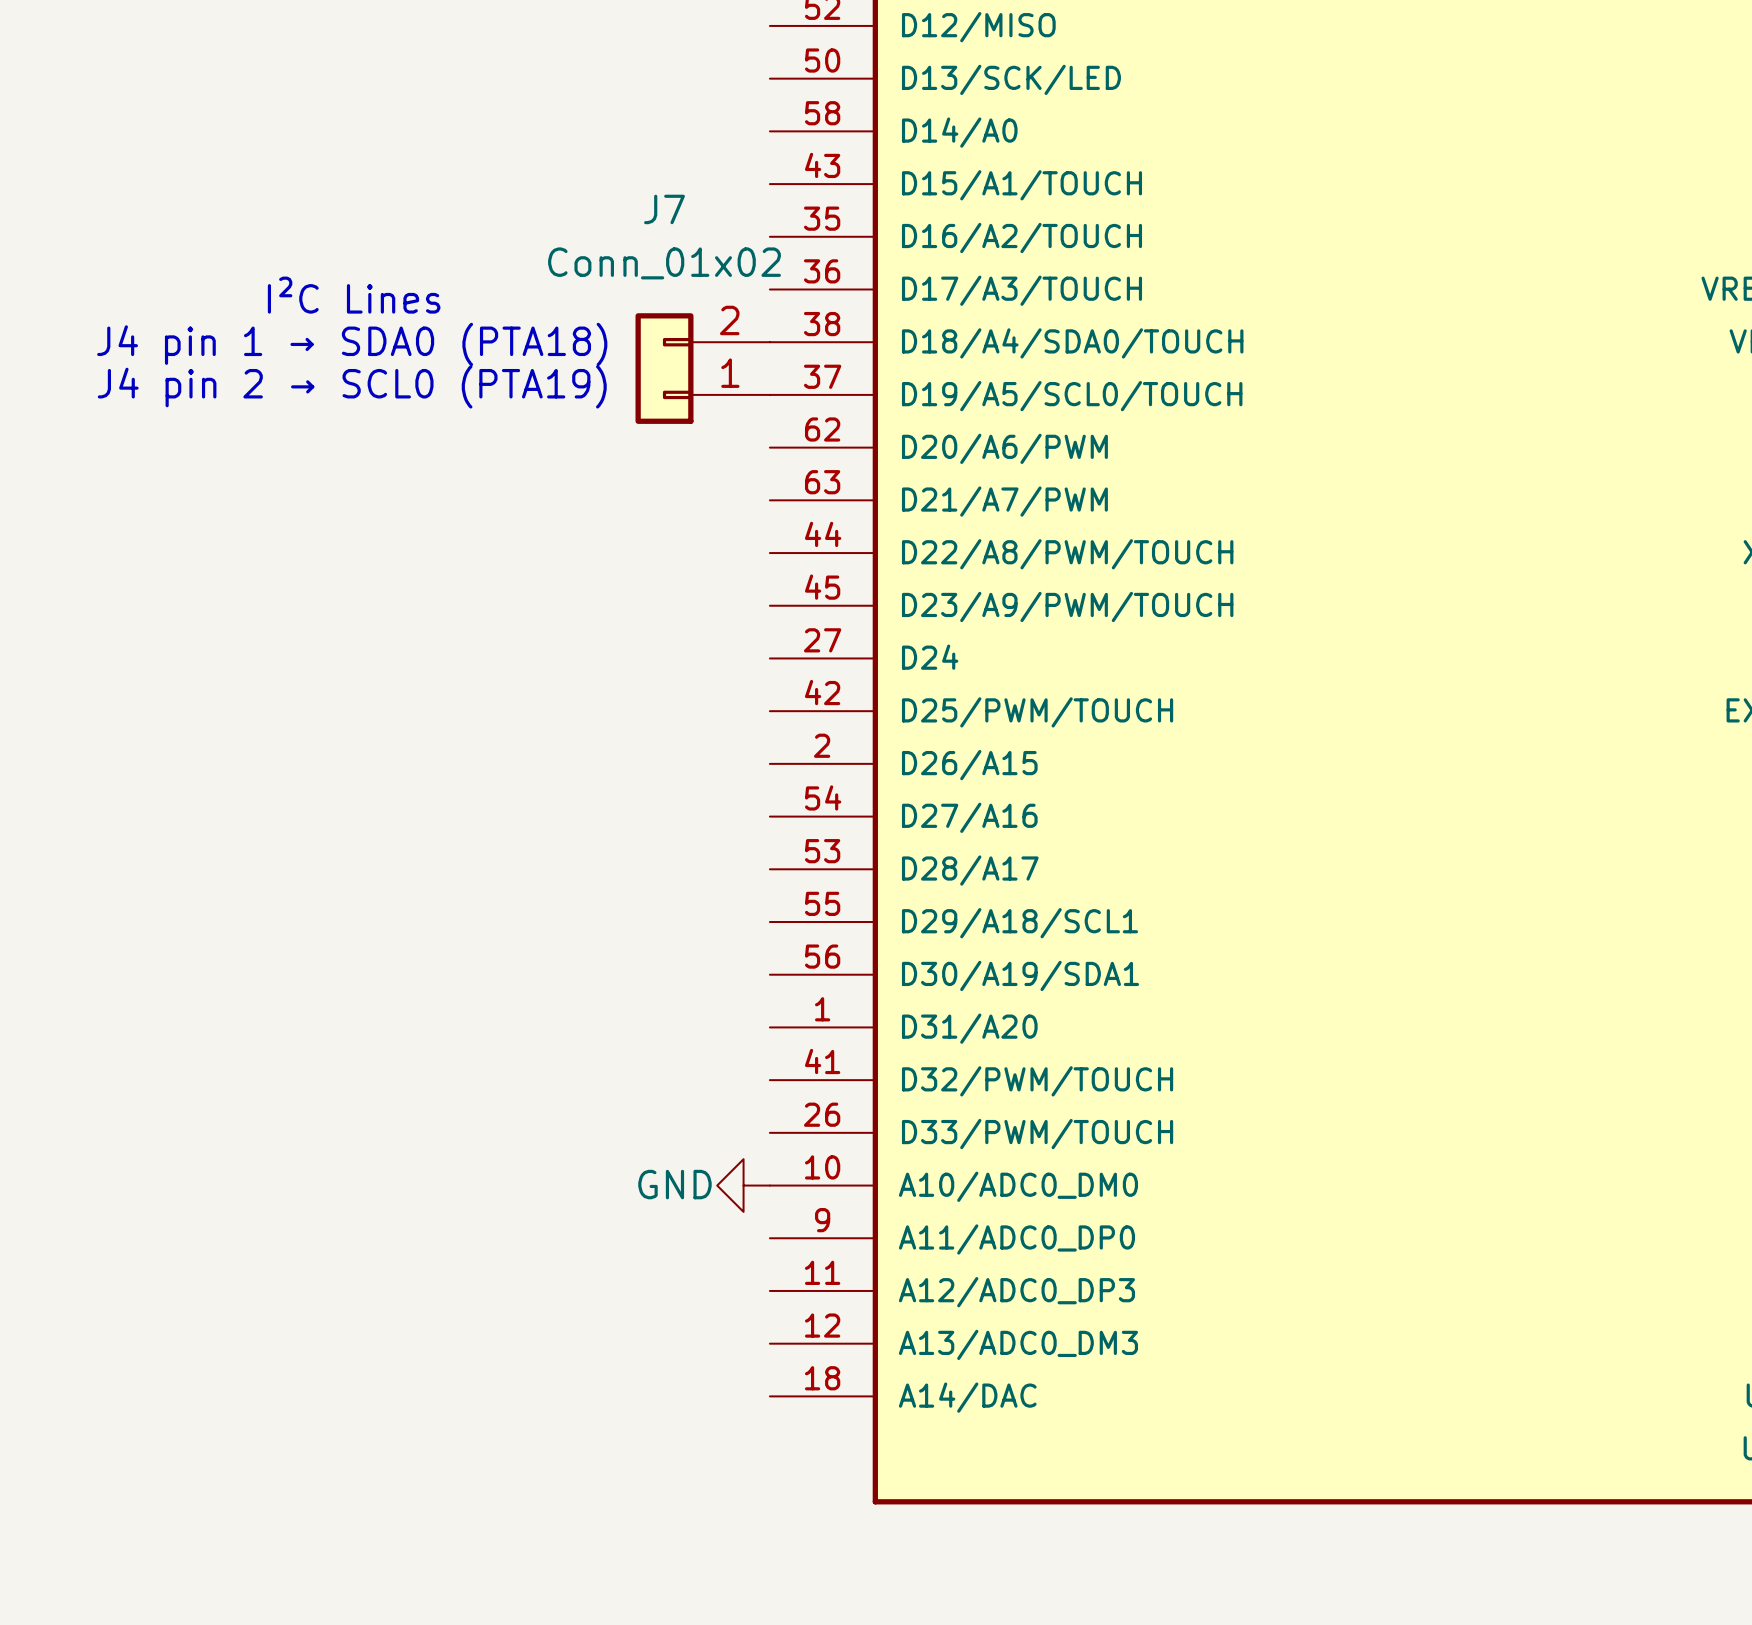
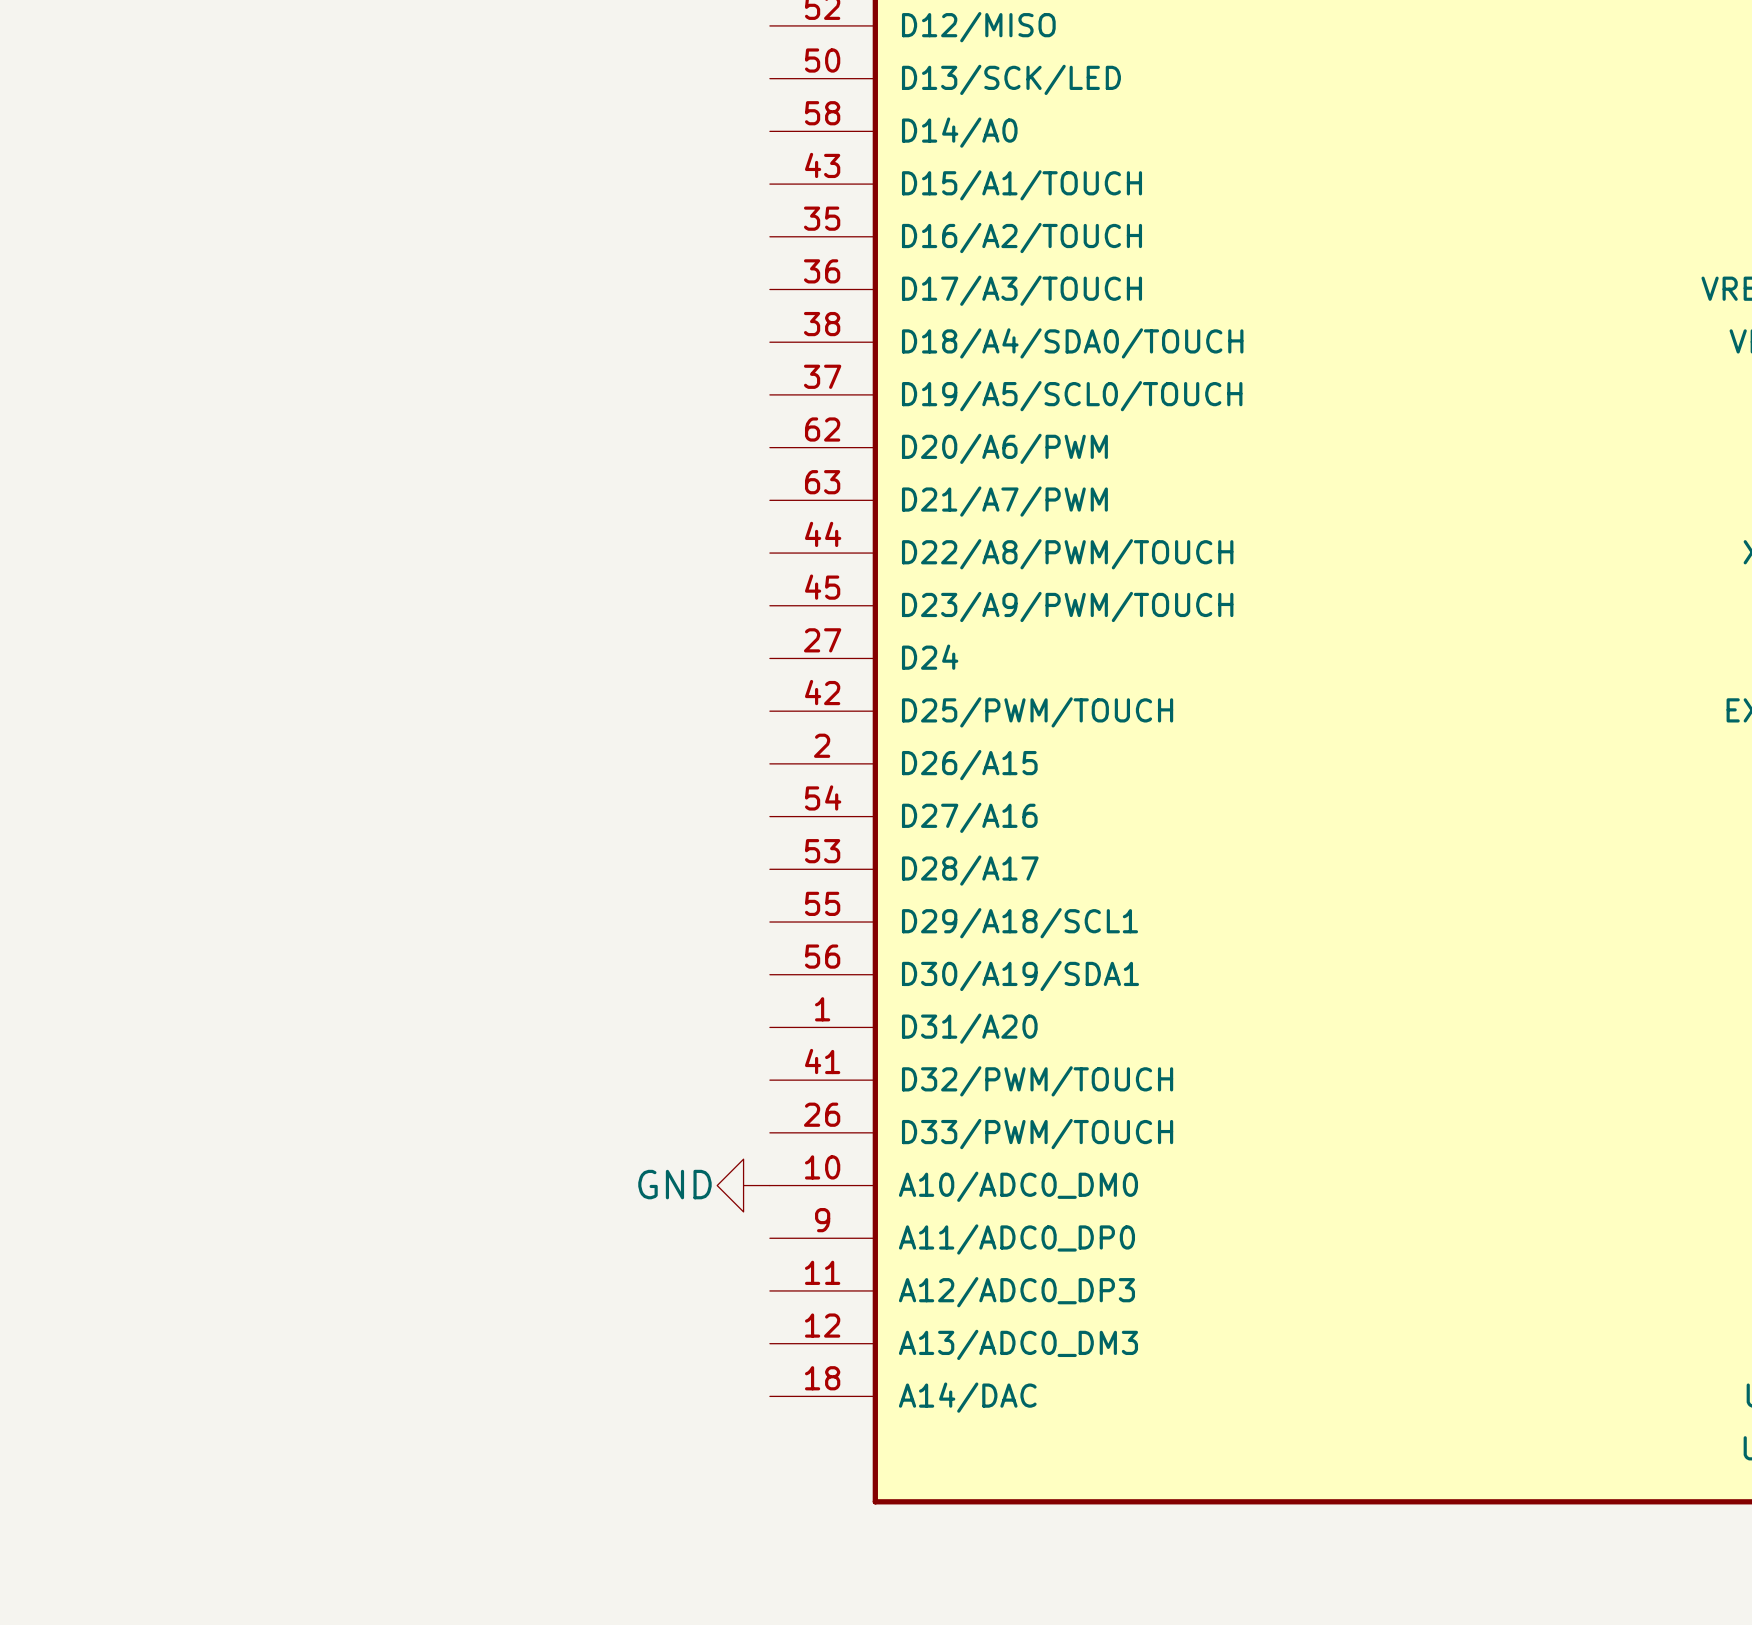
text: I²C Lines (354, 295) -> none
text: J4 pin 1 → SDA0 (PTA18) (352, 344) -> none
J7: Conn_01x02 (702, 368) -> none
text: J4 pin 2 → SCL0 (PTA19) (352, 386) -> none

